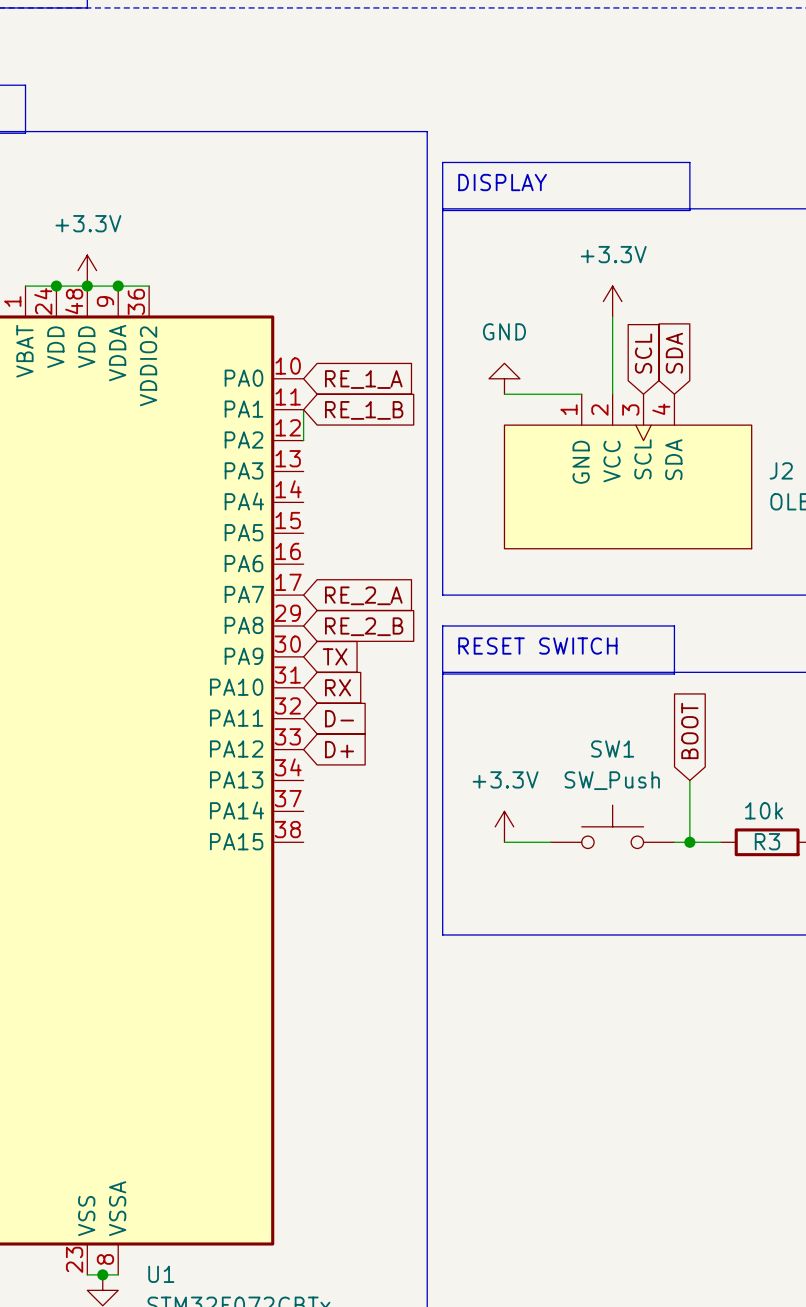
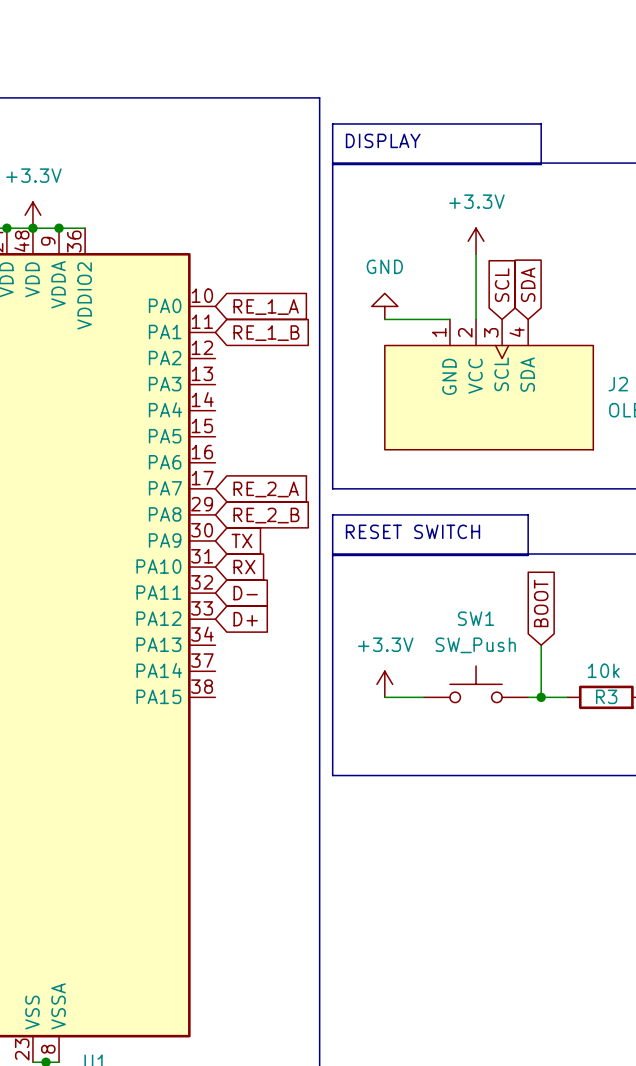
wire: (303, 409) (303, 440) -> none

